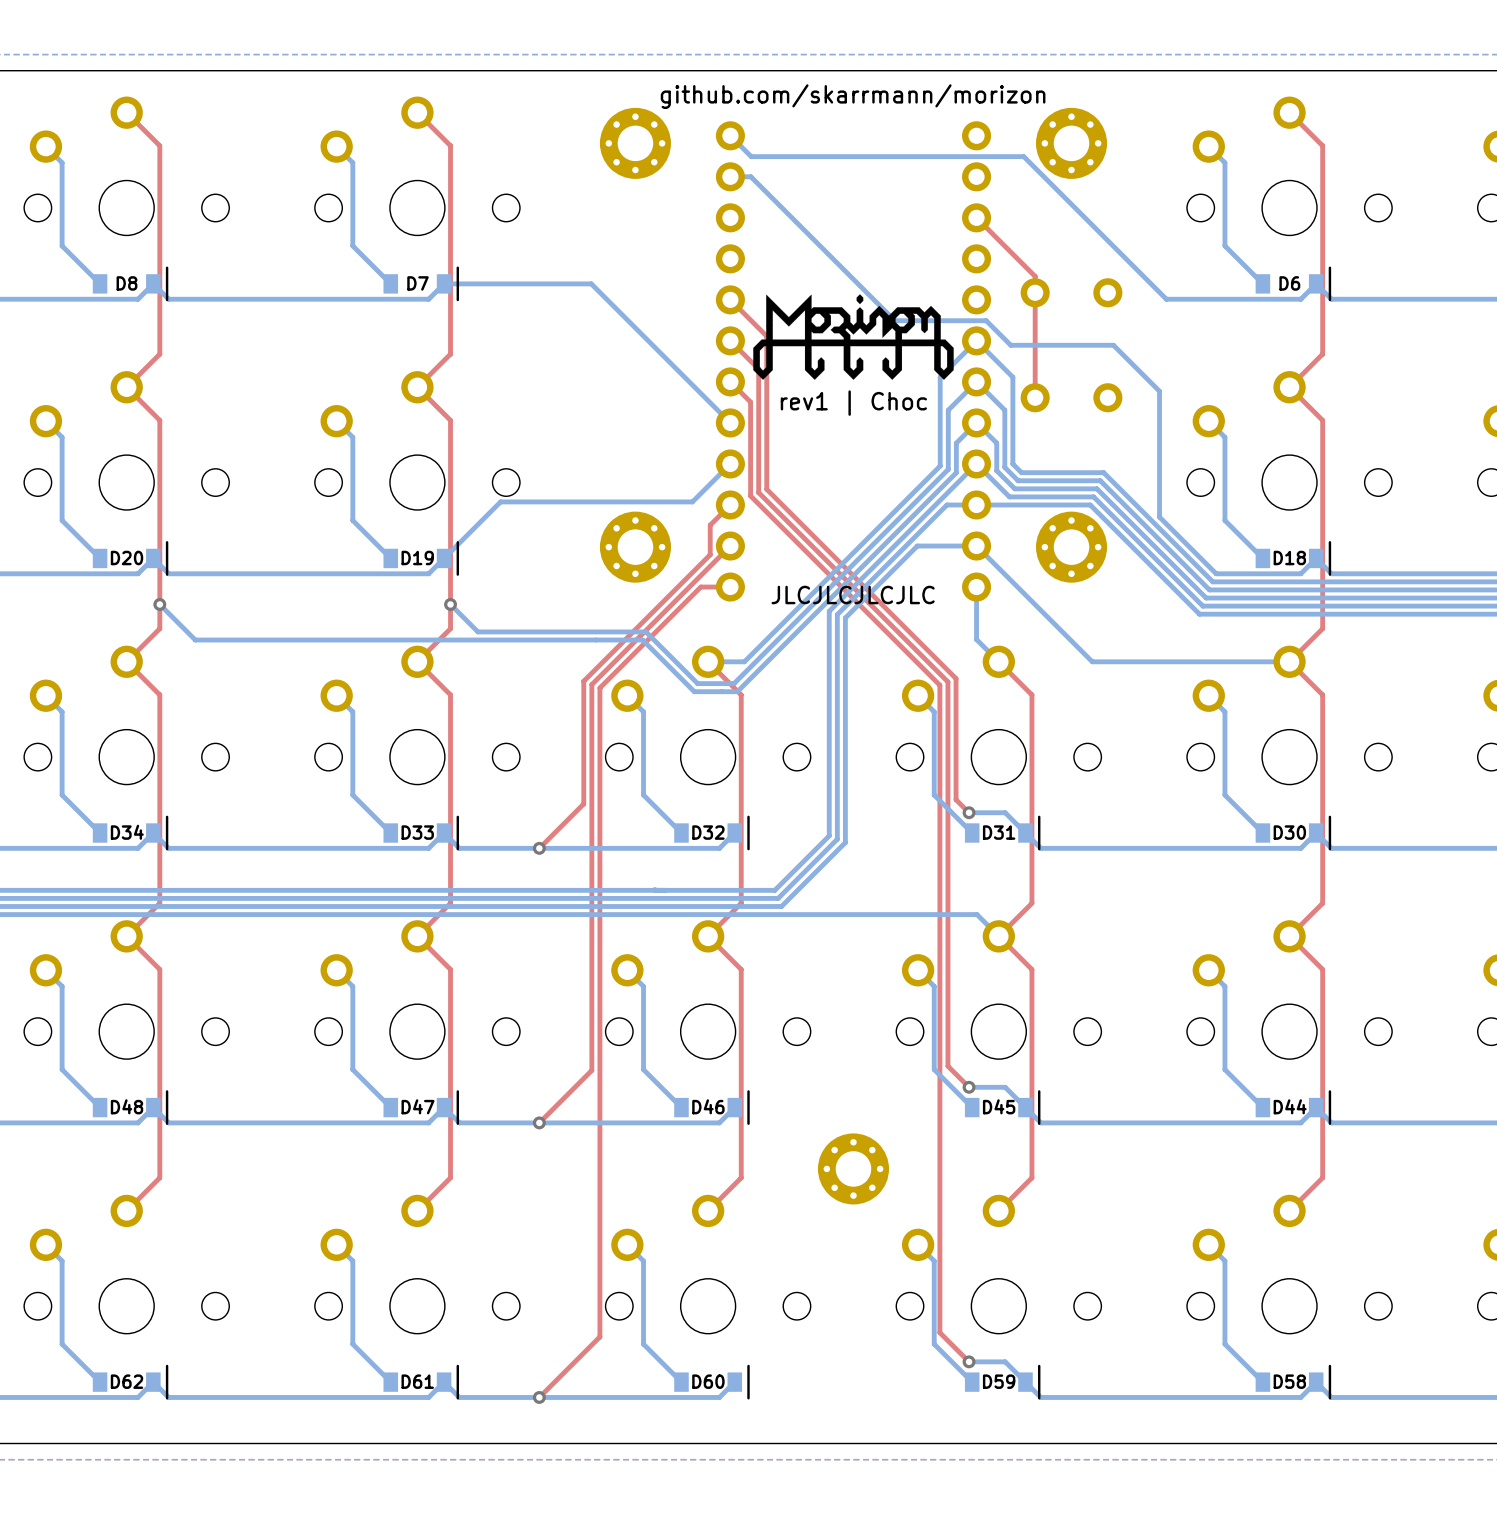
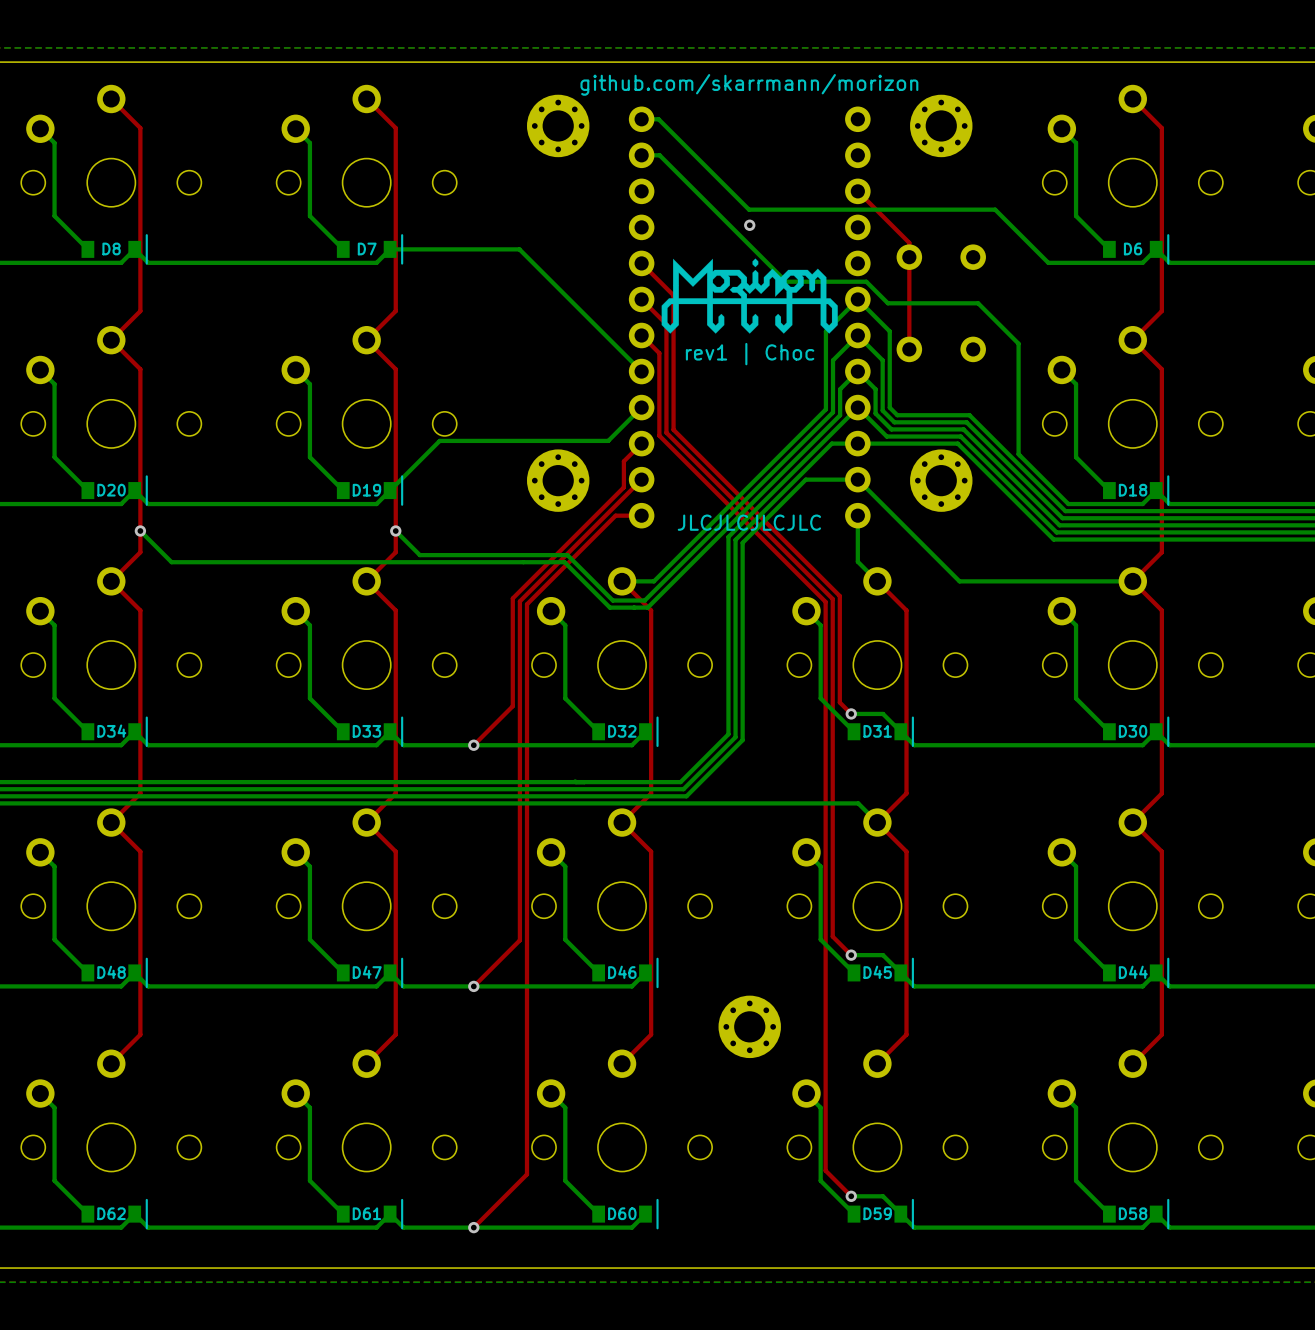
bottom track: (730, 135) (751, 156) (1023, 156) (1166, 299) (1193, 299) -> (641, 119) (658, 119) (749, 209) (995, 209) (1048, 262)
via: none -> (749, 225)

